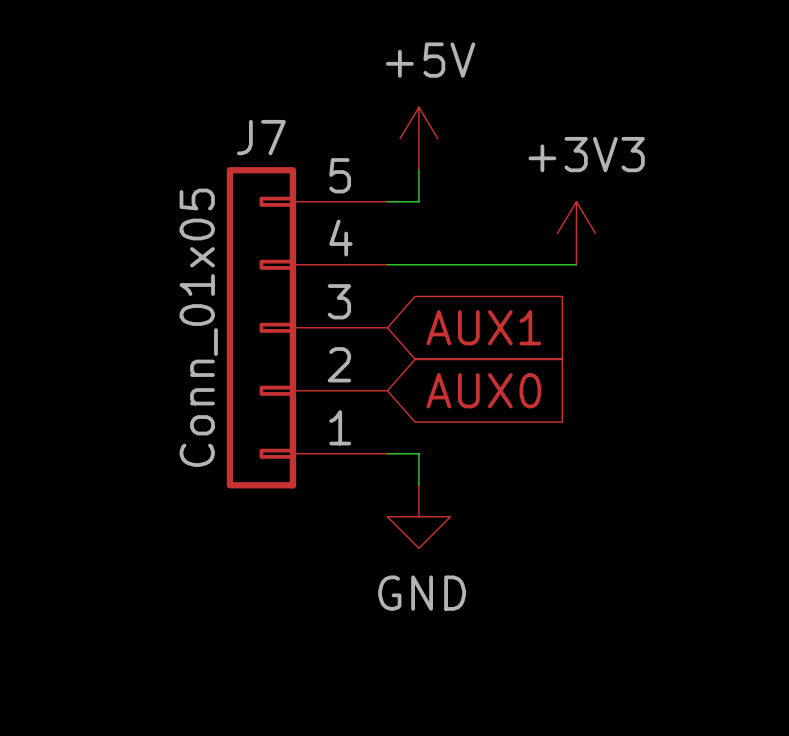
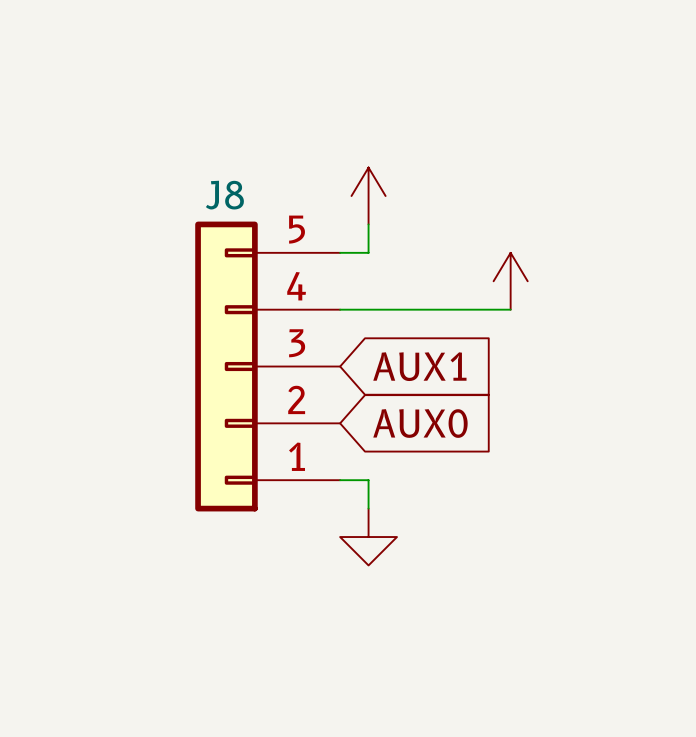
power symbol text: +5V (430, 60) -> none
J7 name: J7 (261, 137) -> J8 (224, 195)
power symbol text: +3V3 (586, 154) -> none
J7 value: Conn_01x05 (198, 327) -> none
power symbol text: GND (422, 593) -> none

